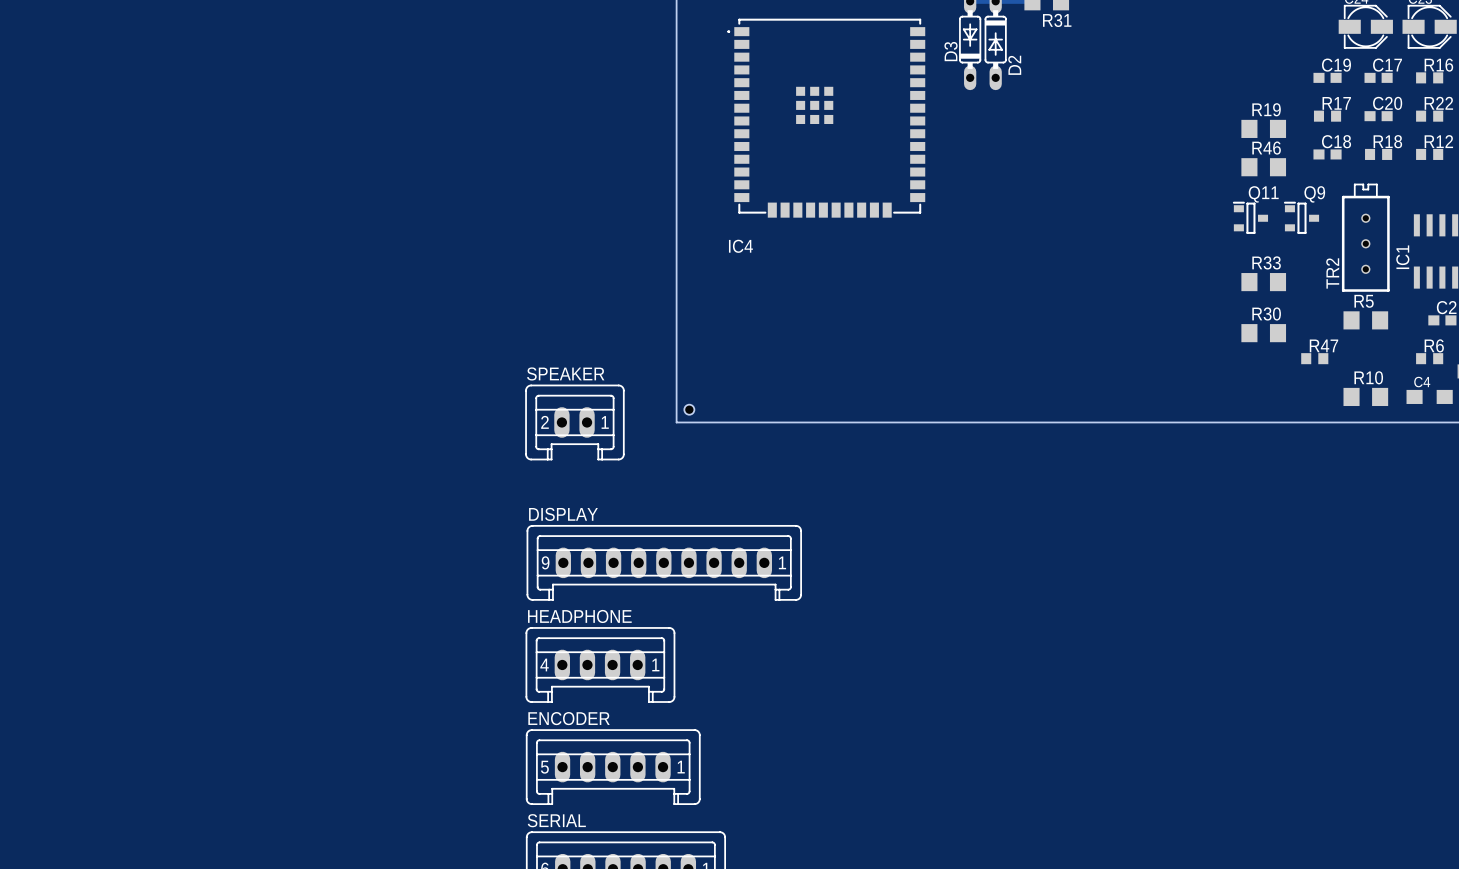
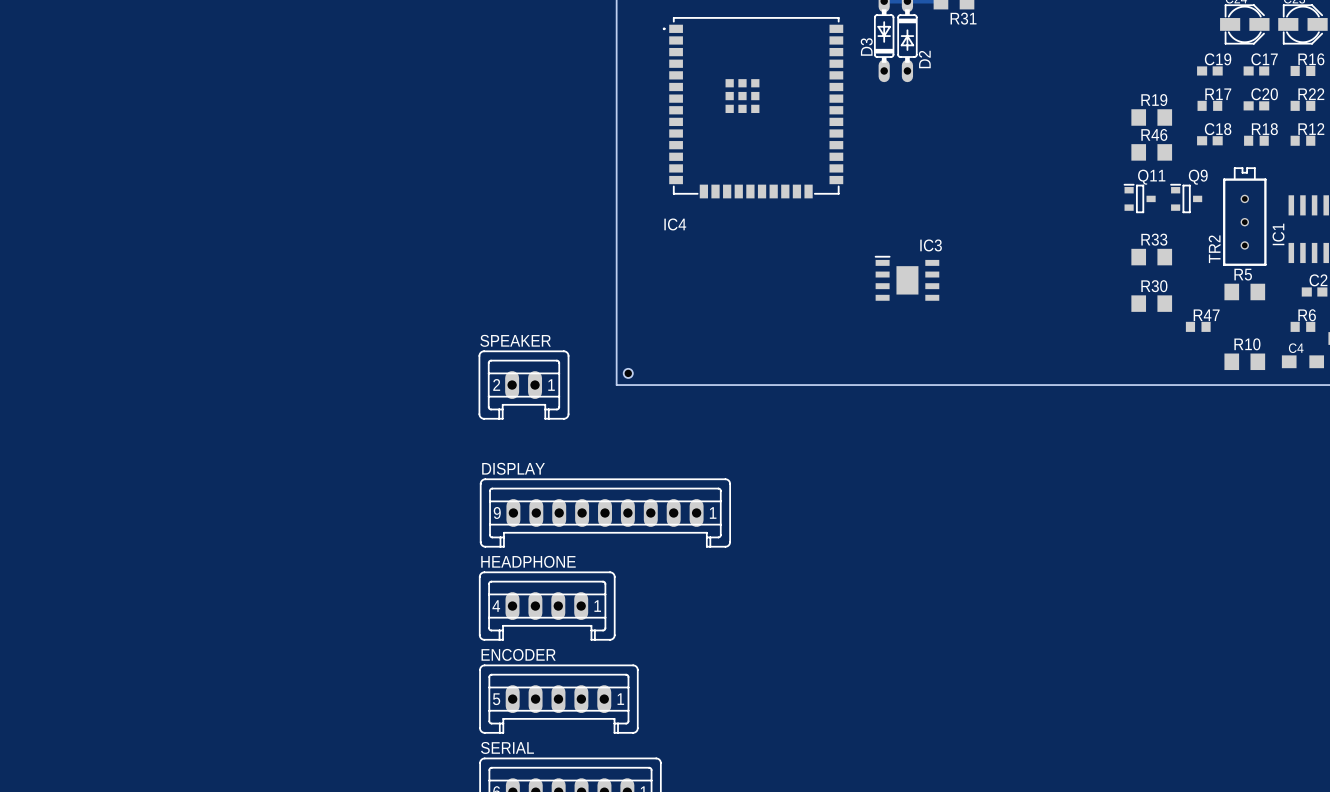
IC3: none -> (906, 278)

